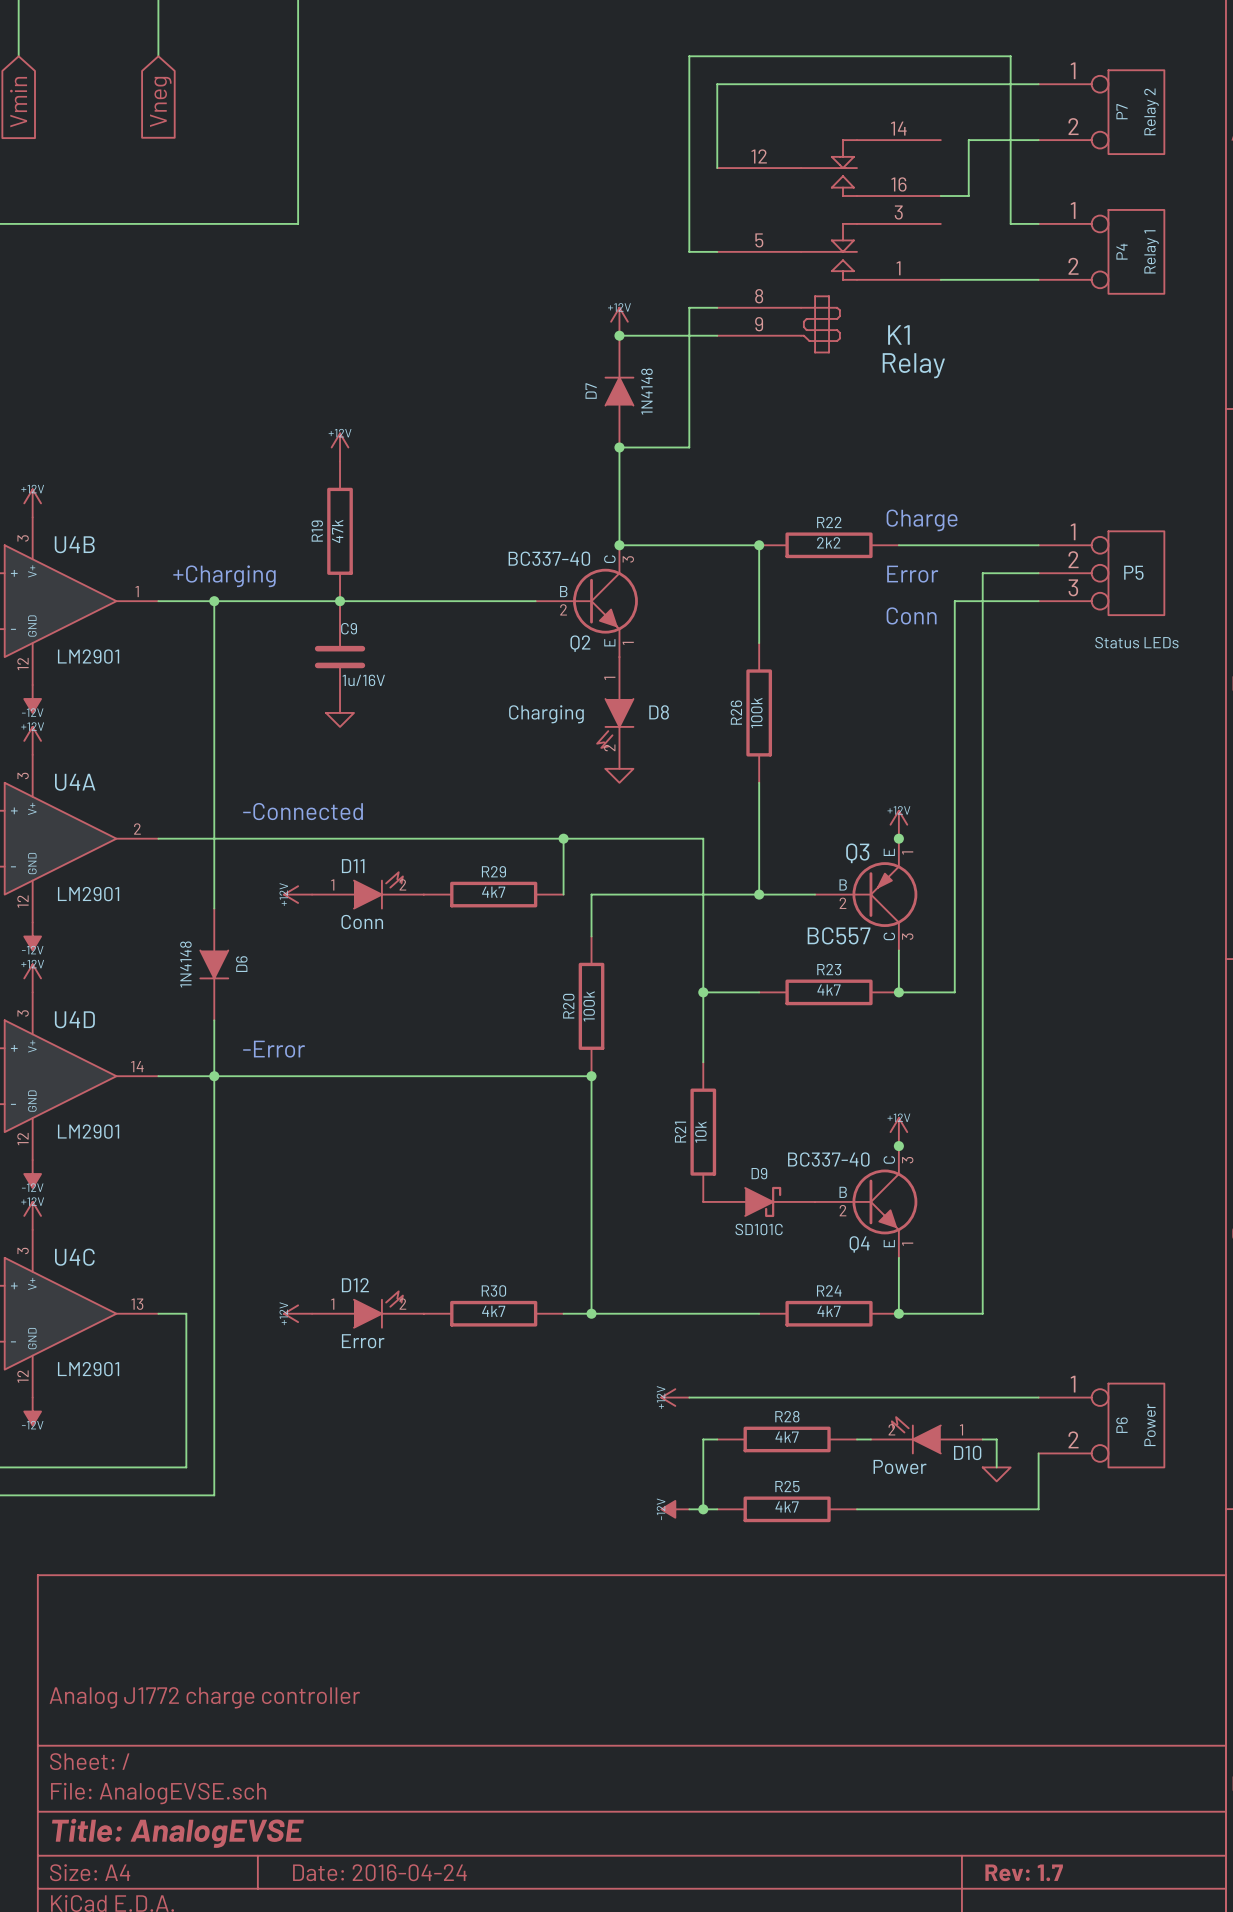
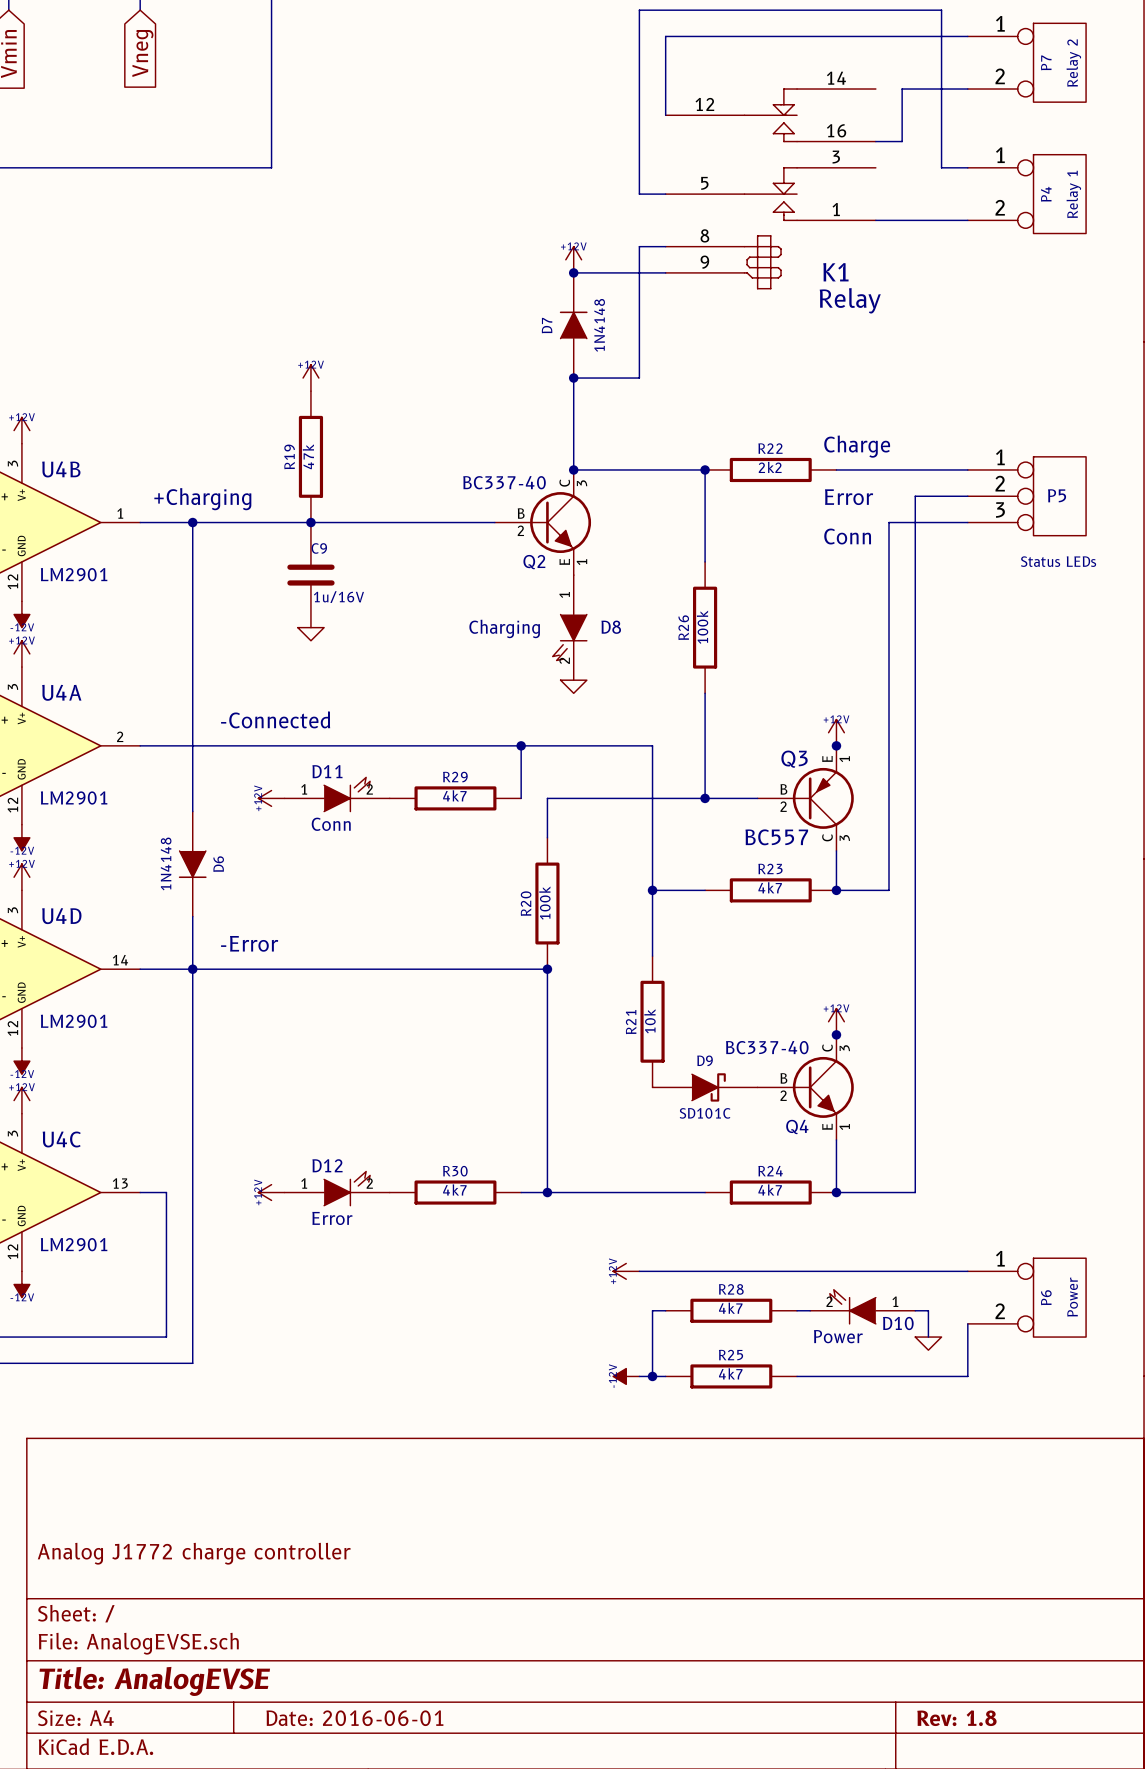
title block: Date: 2016-04-24 (379, 1872) -> Date: 2016-06-01 (354, 1718)
title block: Rev: 1.7 (1024, 1872) -> Rev: 1.8 (956, 1718)

